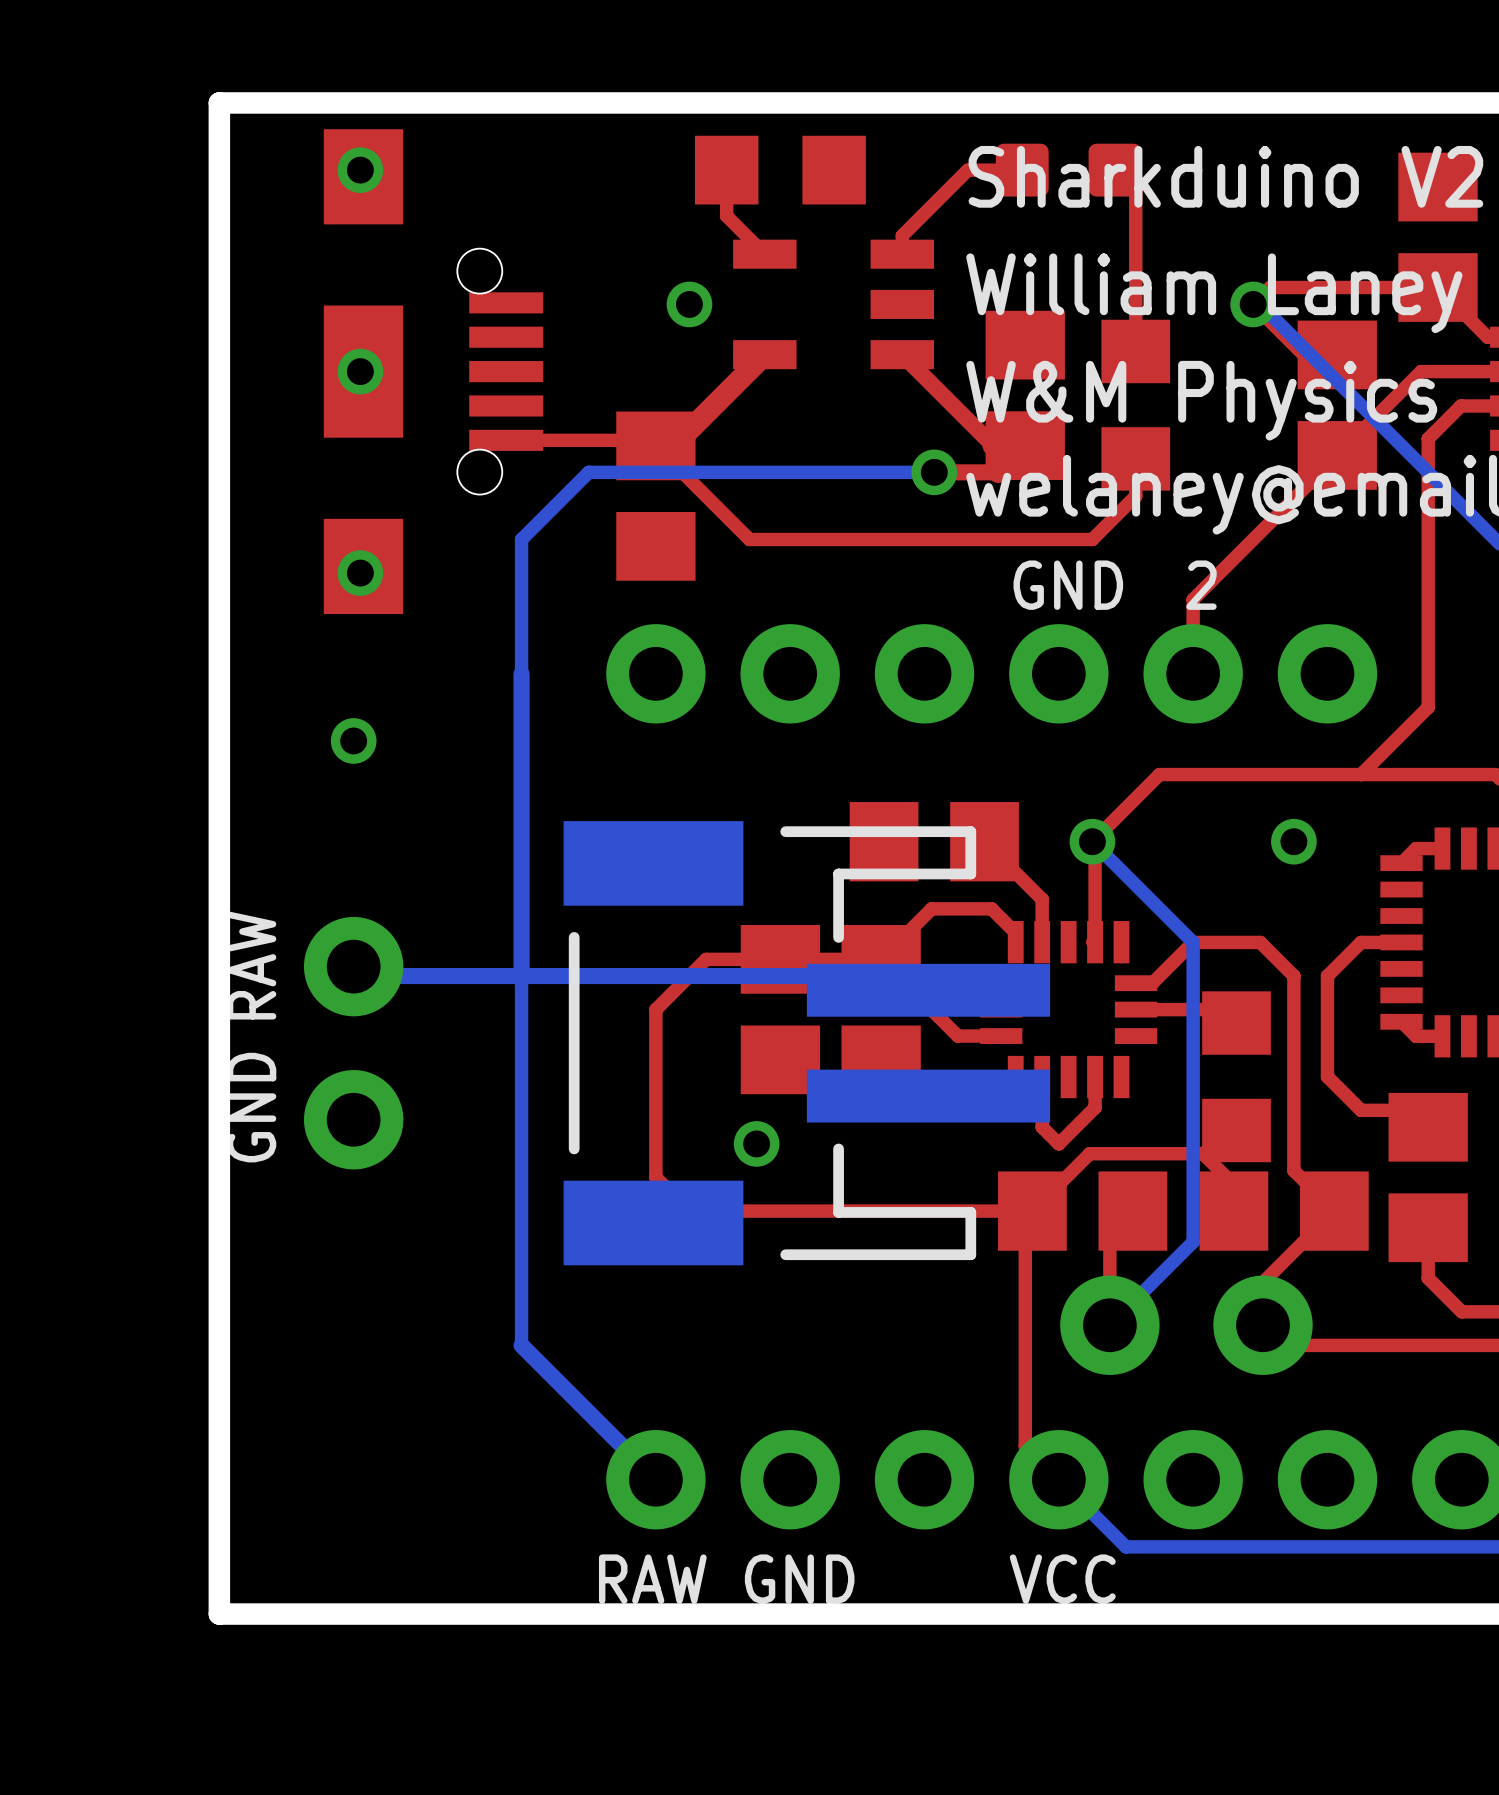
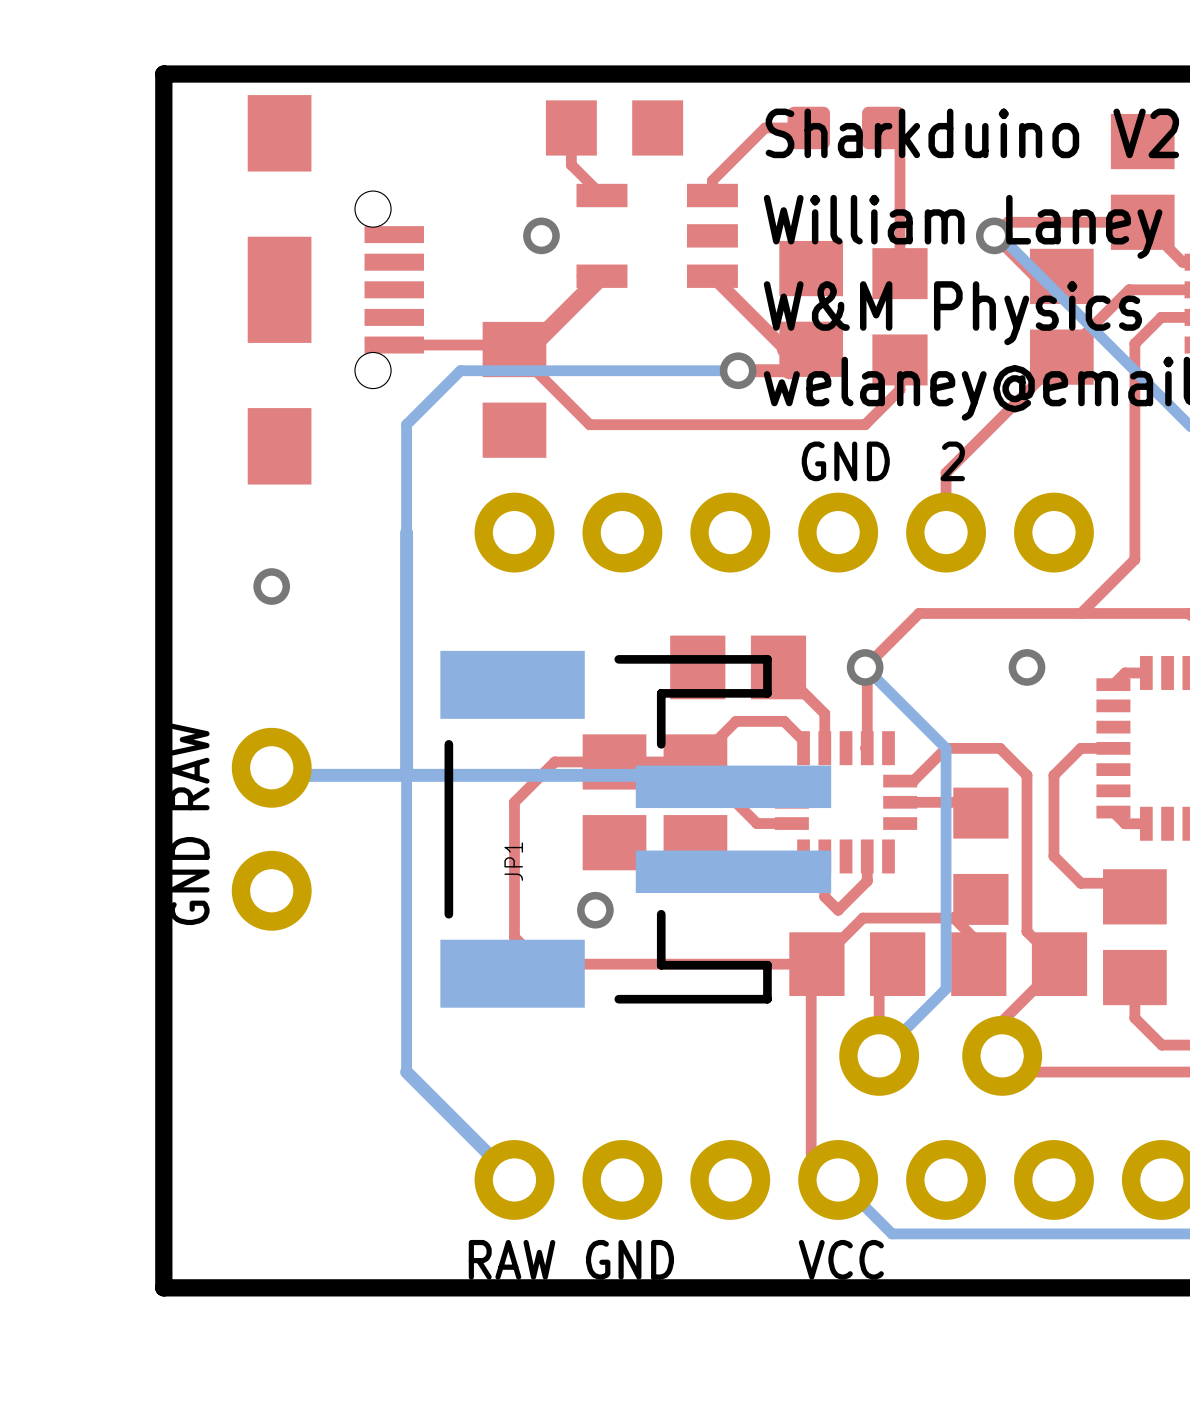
via: (360, 170) -> none
via: (360, 371) -> none
via: (360, 573) -> none
JP1 name: none -> JP1 (513, 861)

